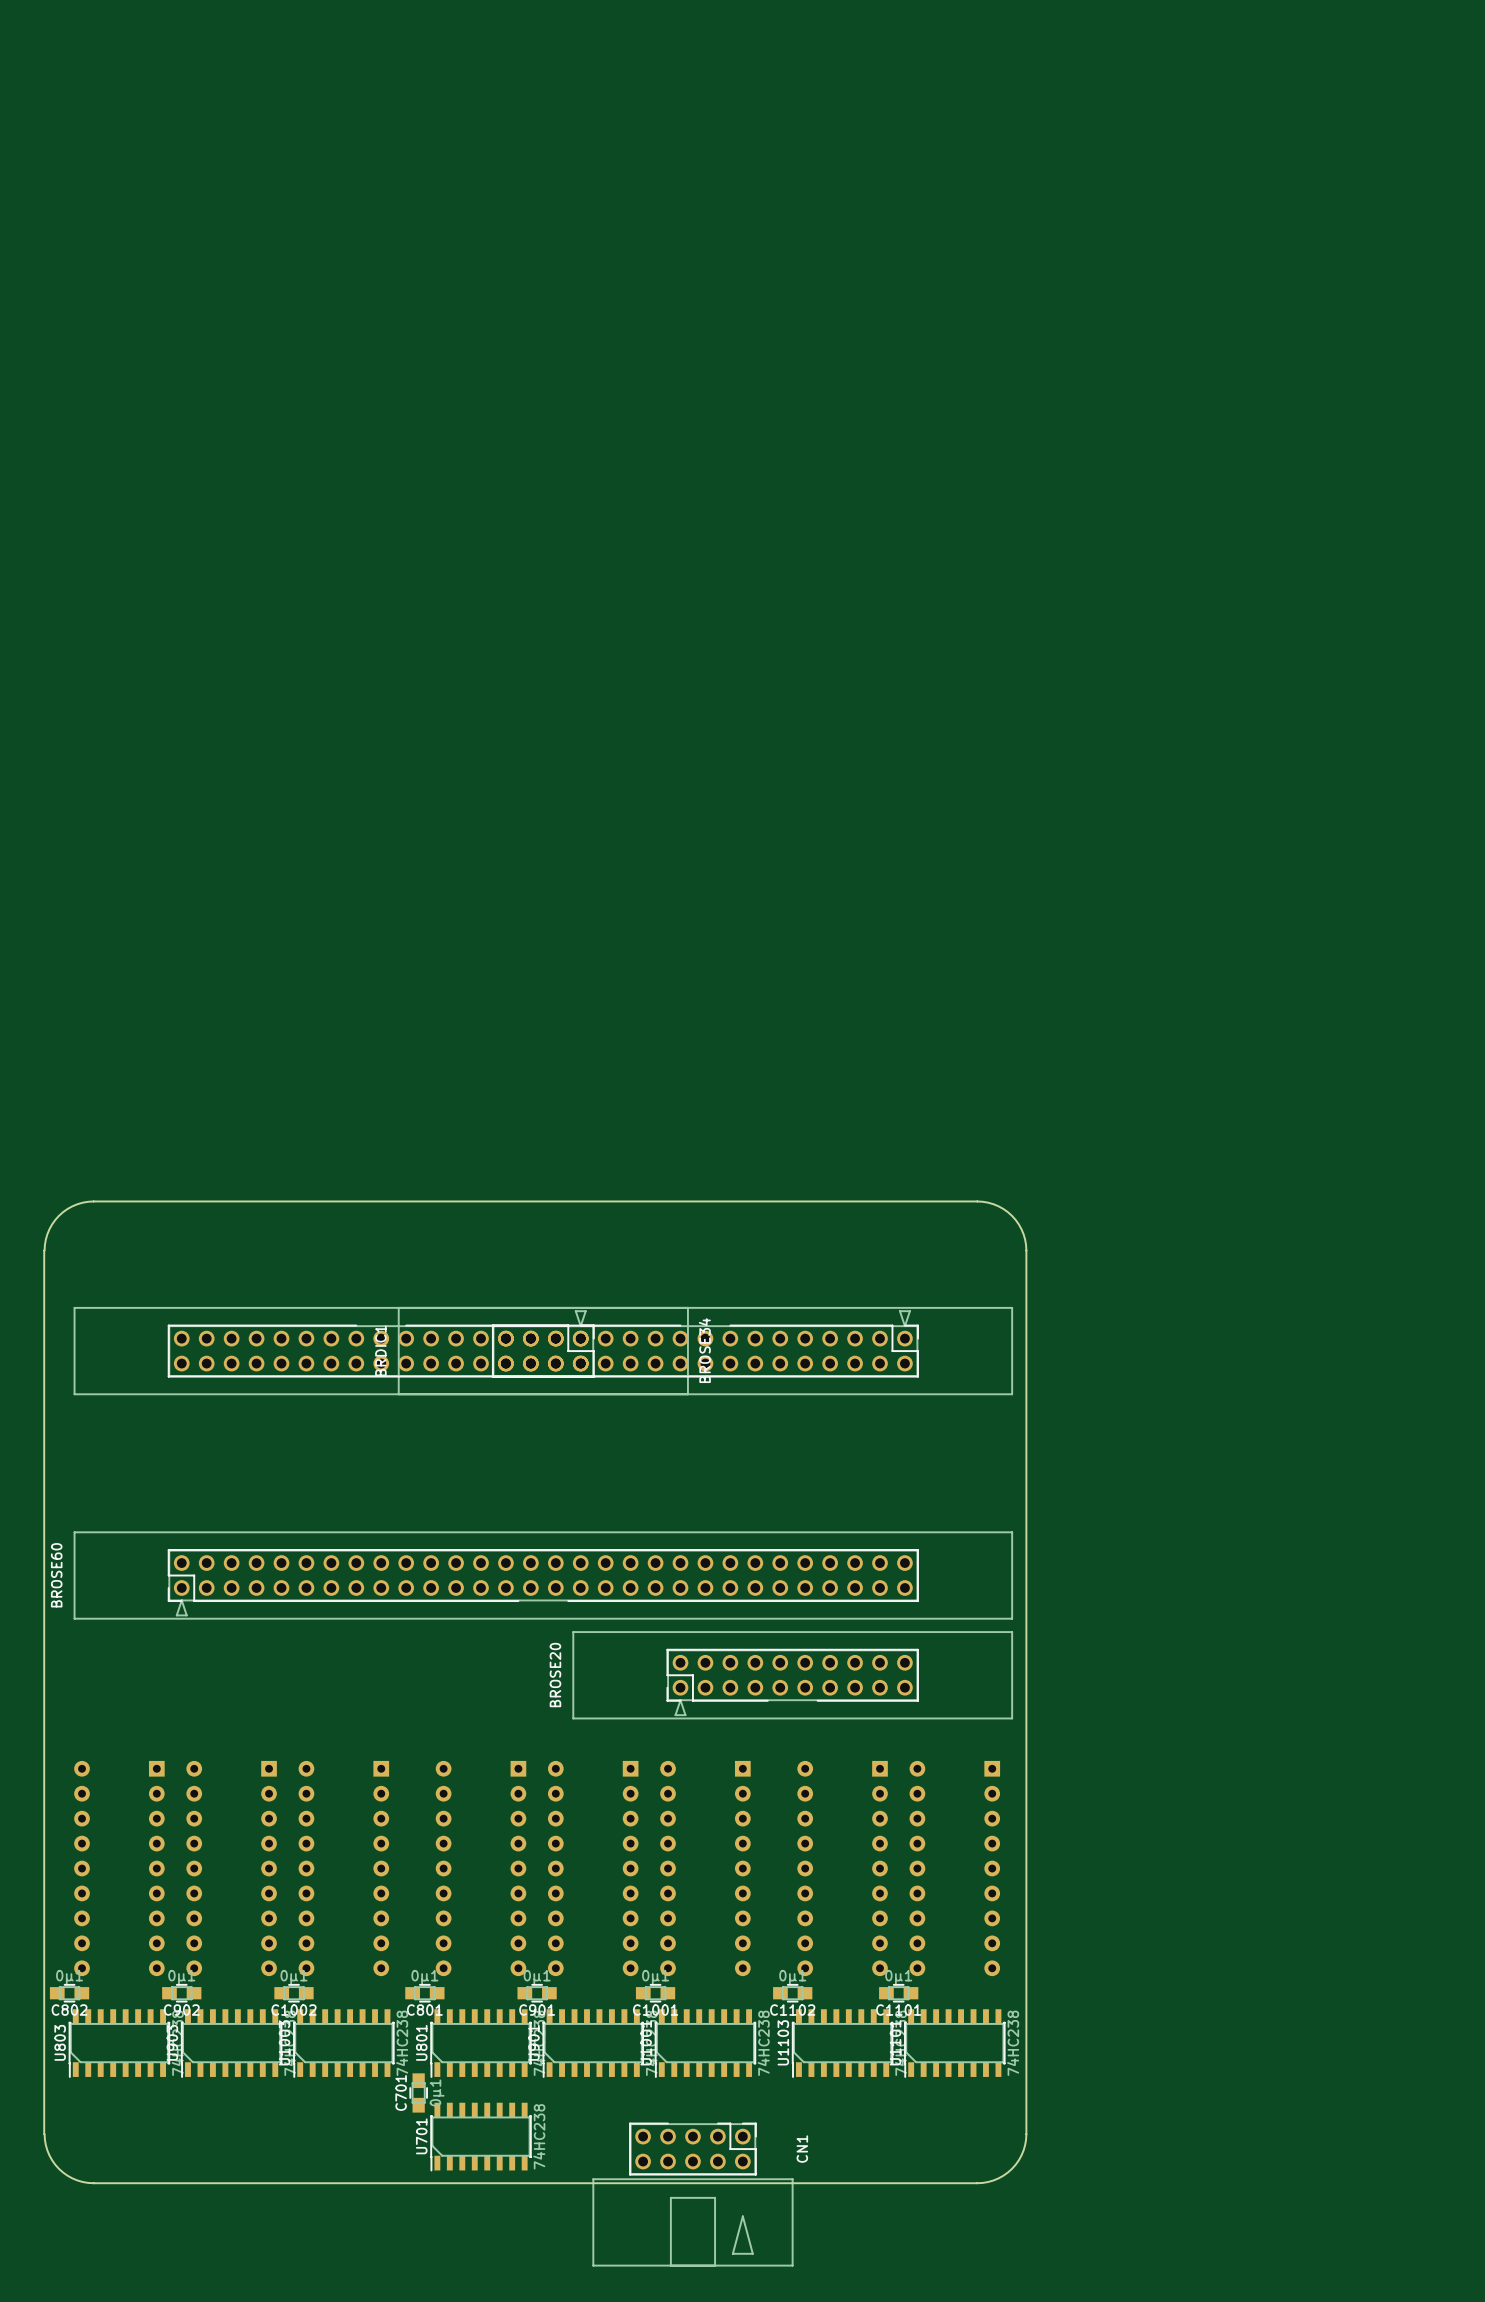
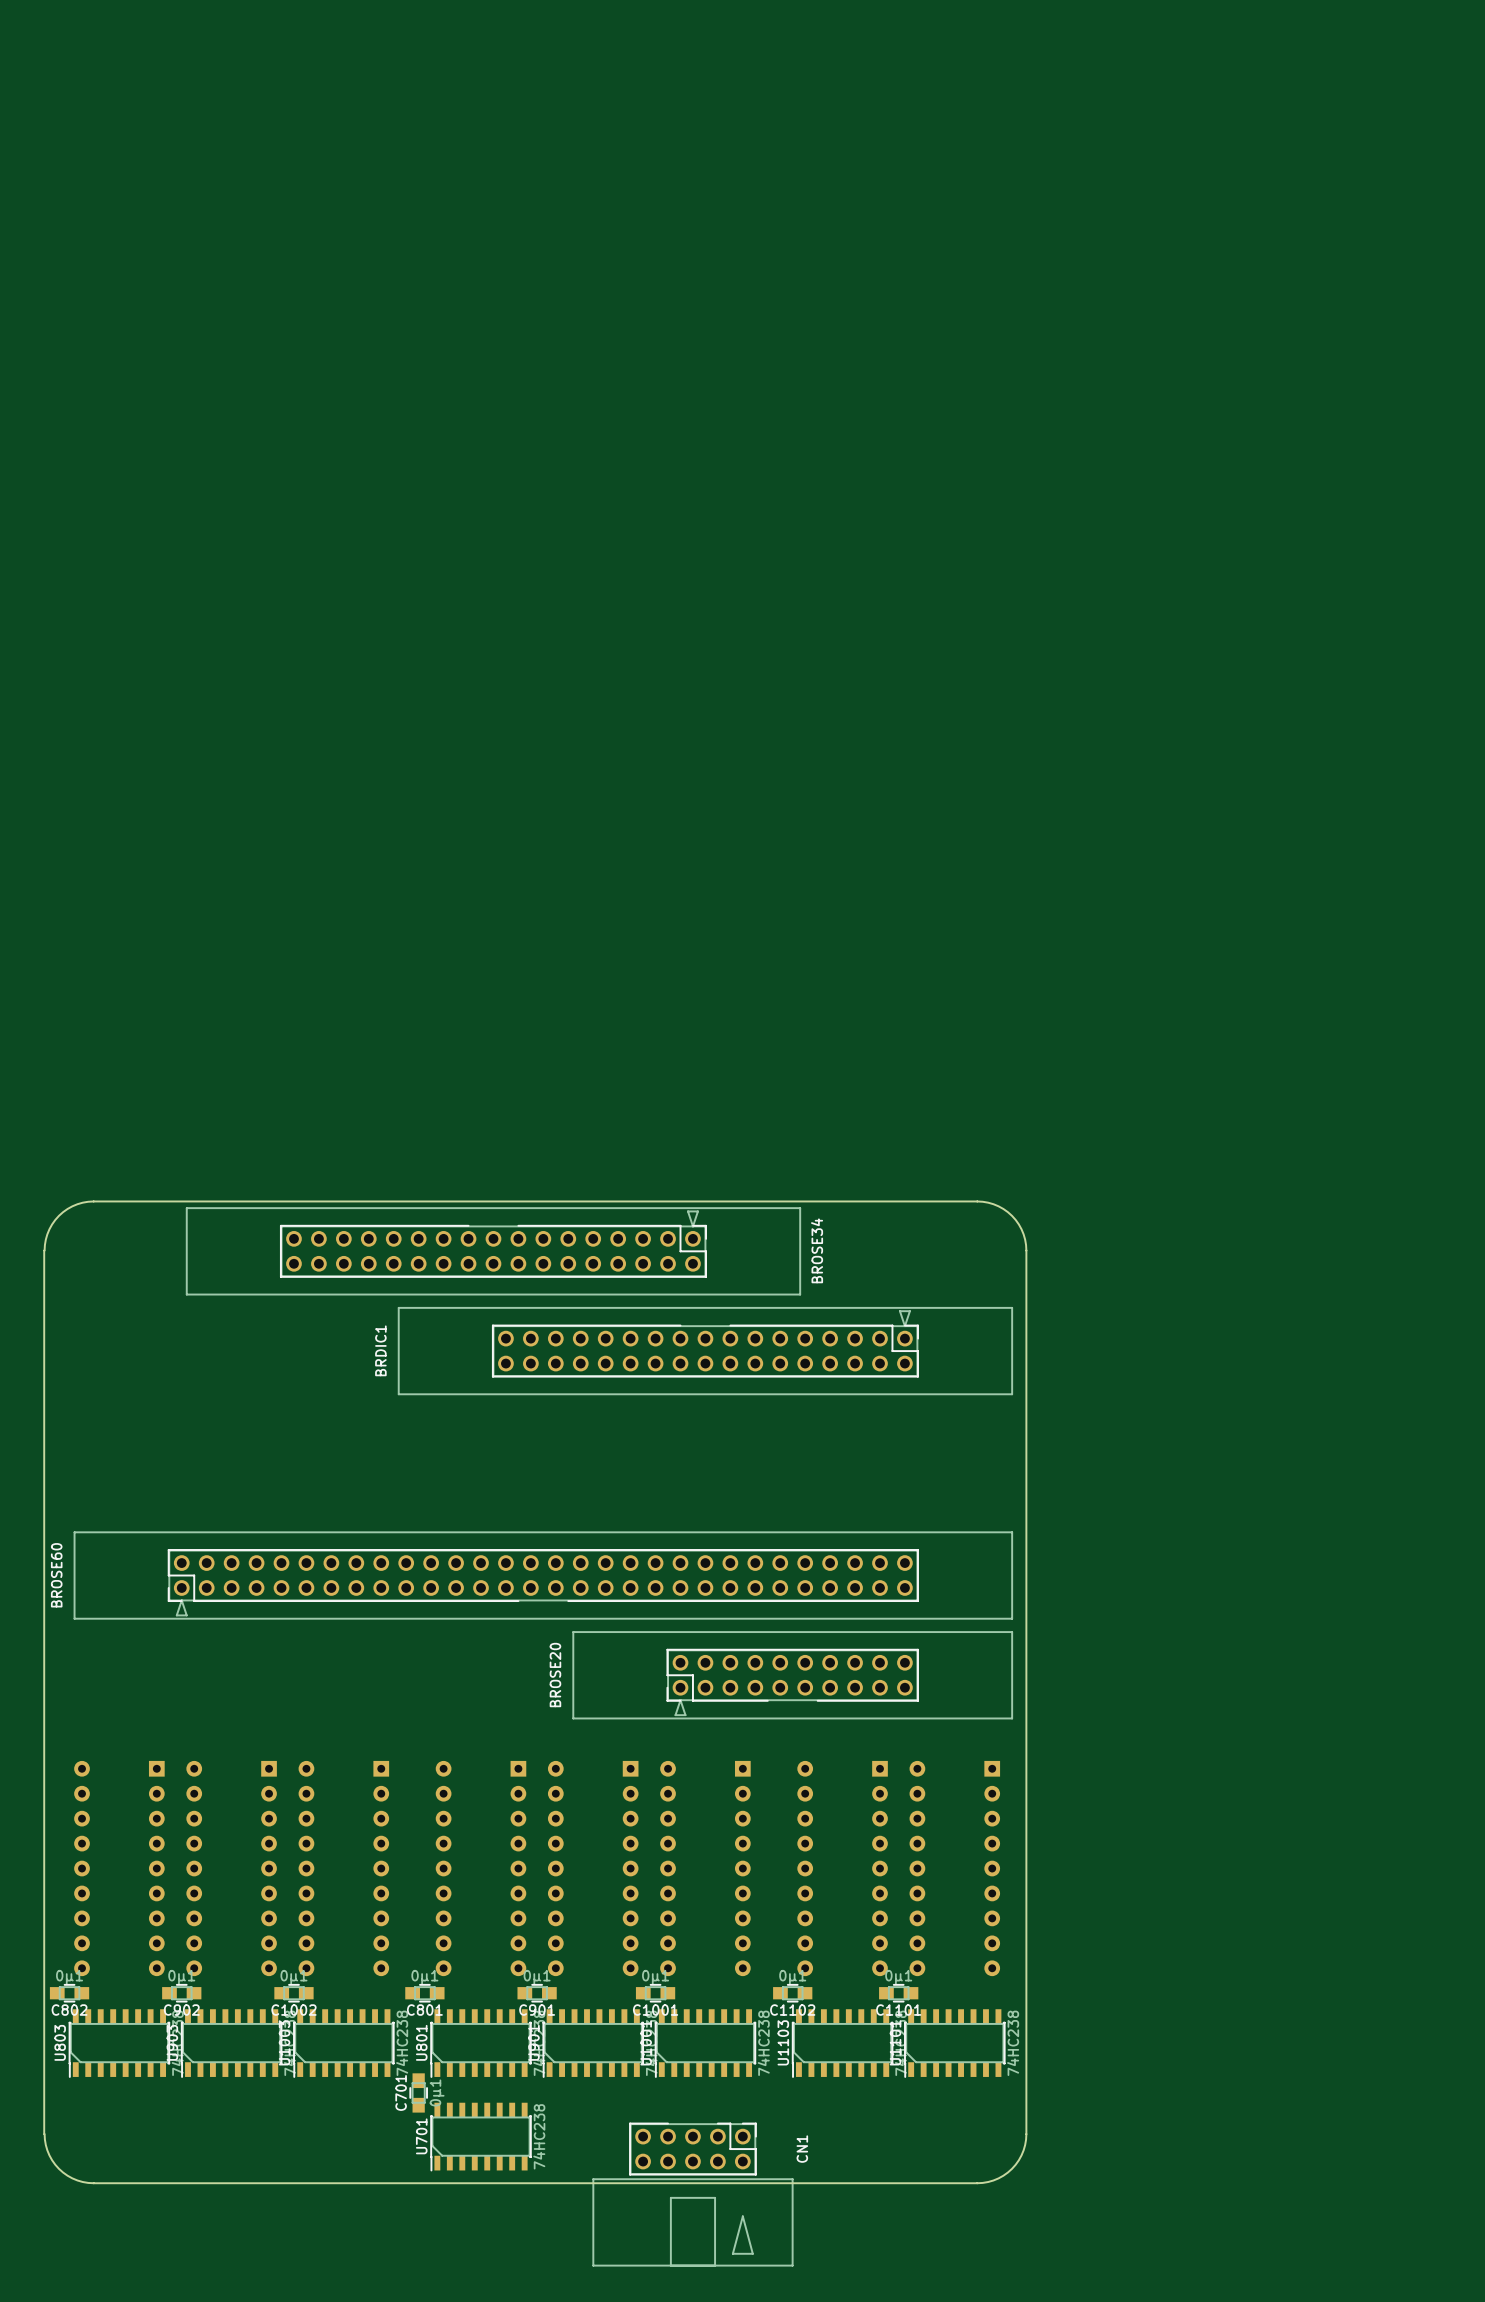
BROSE34 position: (381, 1351) -> (493, 1251)

